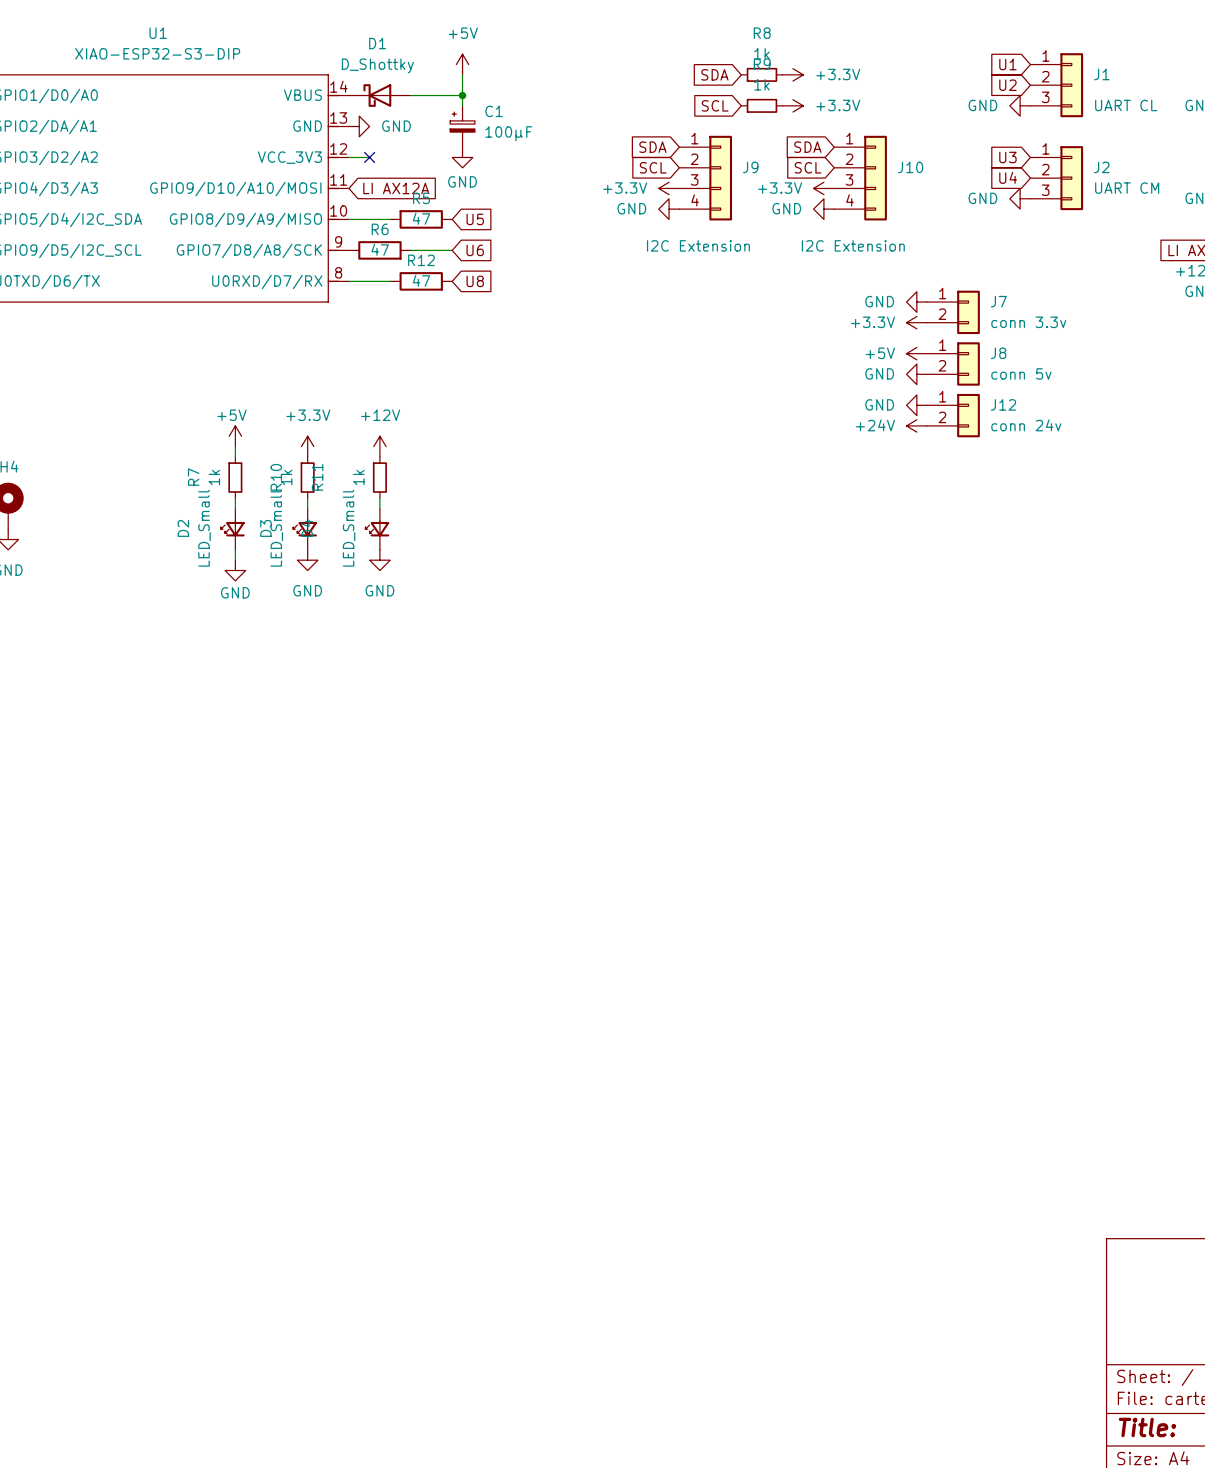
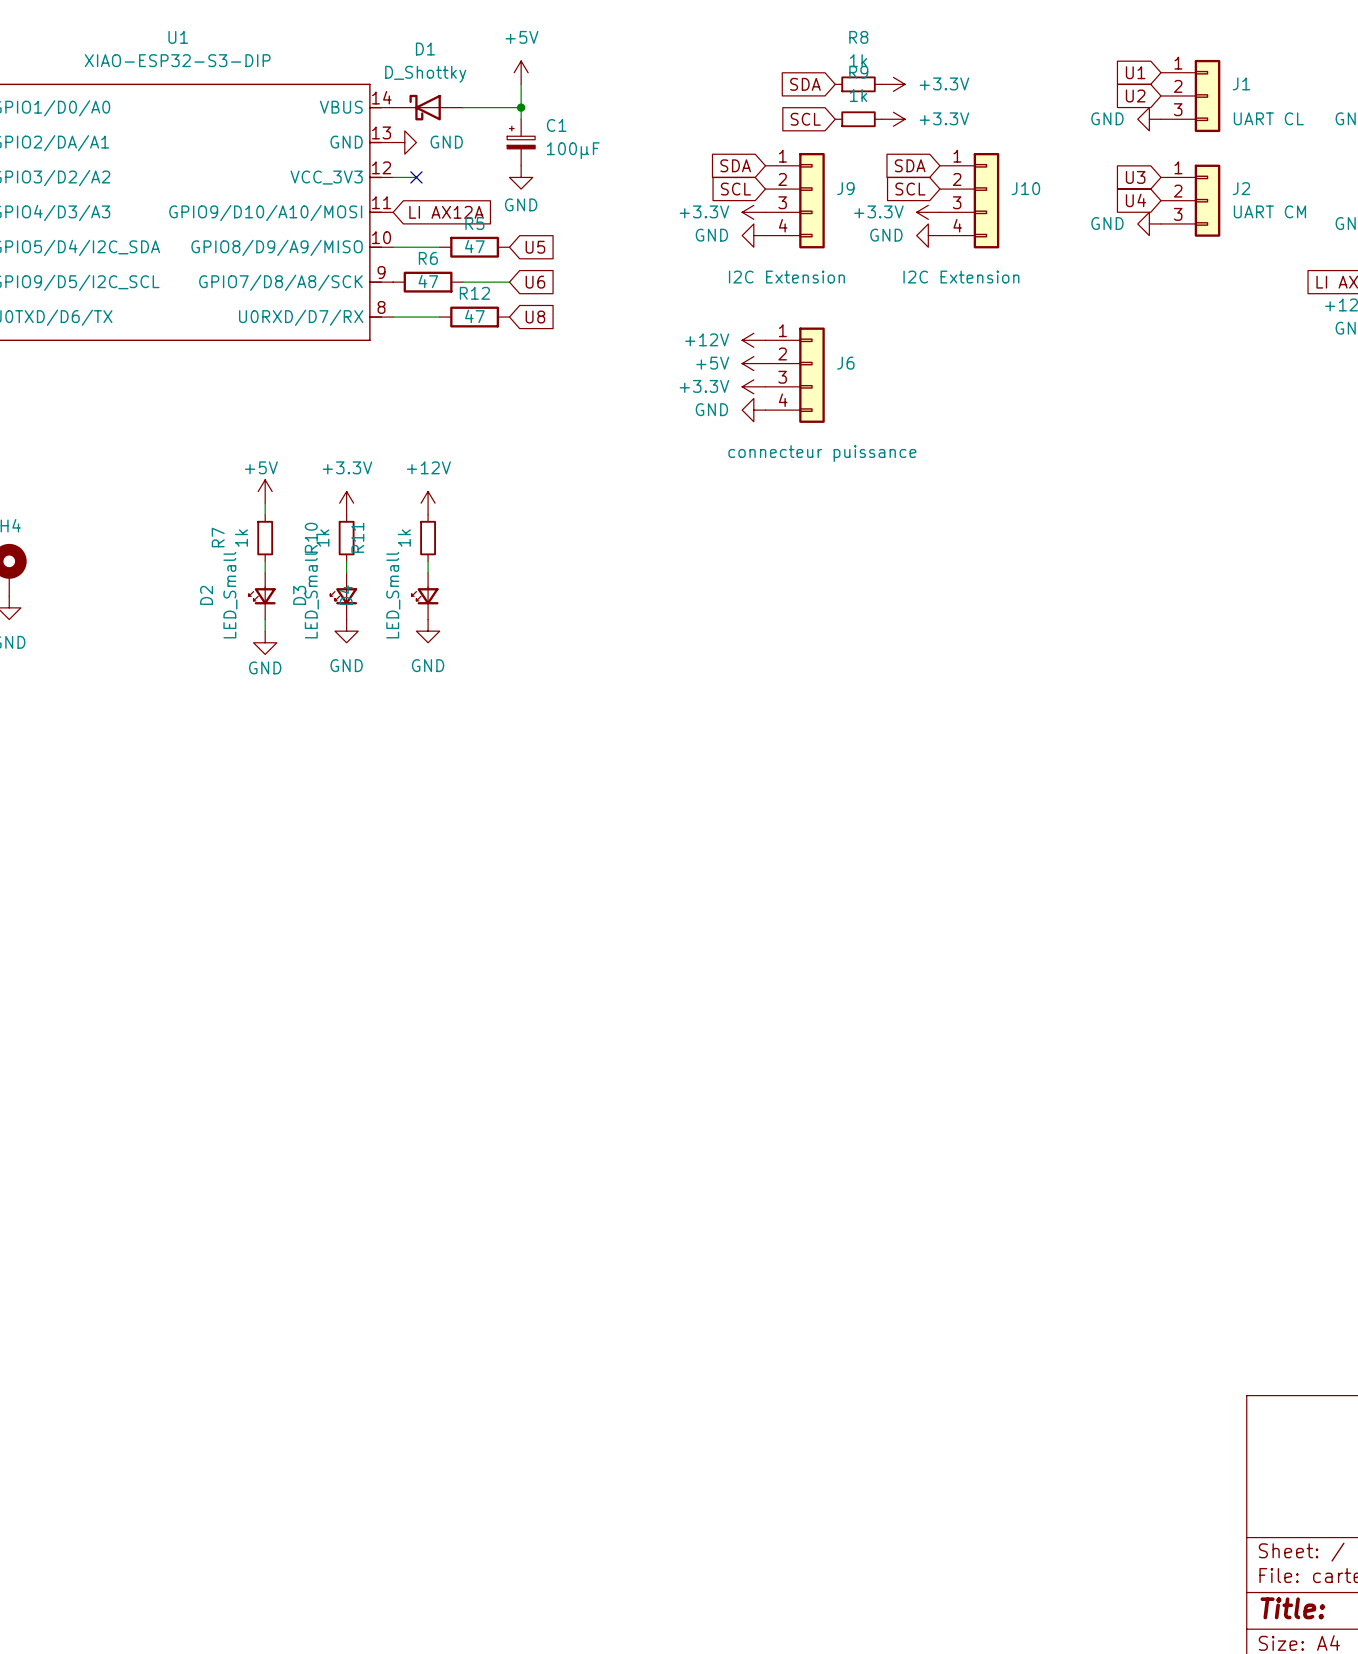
power symbol: none -> +12V (753, 340)
power symbol: GND (916, 302) -> none
J7: conn 3.3v (953, 312) -> none
power symbol: none -> +5V (753, 363)
power symbol: +3.3V (916, 322) -> none
J6: none -> connecteur puissance (795, 375)
power symbol: none -> +3.3V (753, 386)
power symbol: +5V (916, 353) -> none
power symbol: none -> GND (753, 410)
J8: conn 5v (953, 363) -> none
power symbol: GND (916, 374) -> none
power symbol: GND (916, 405) -> none
J12: conn 24v (953, 415) -> none
power symbol: +24V (916, 425) -> none

